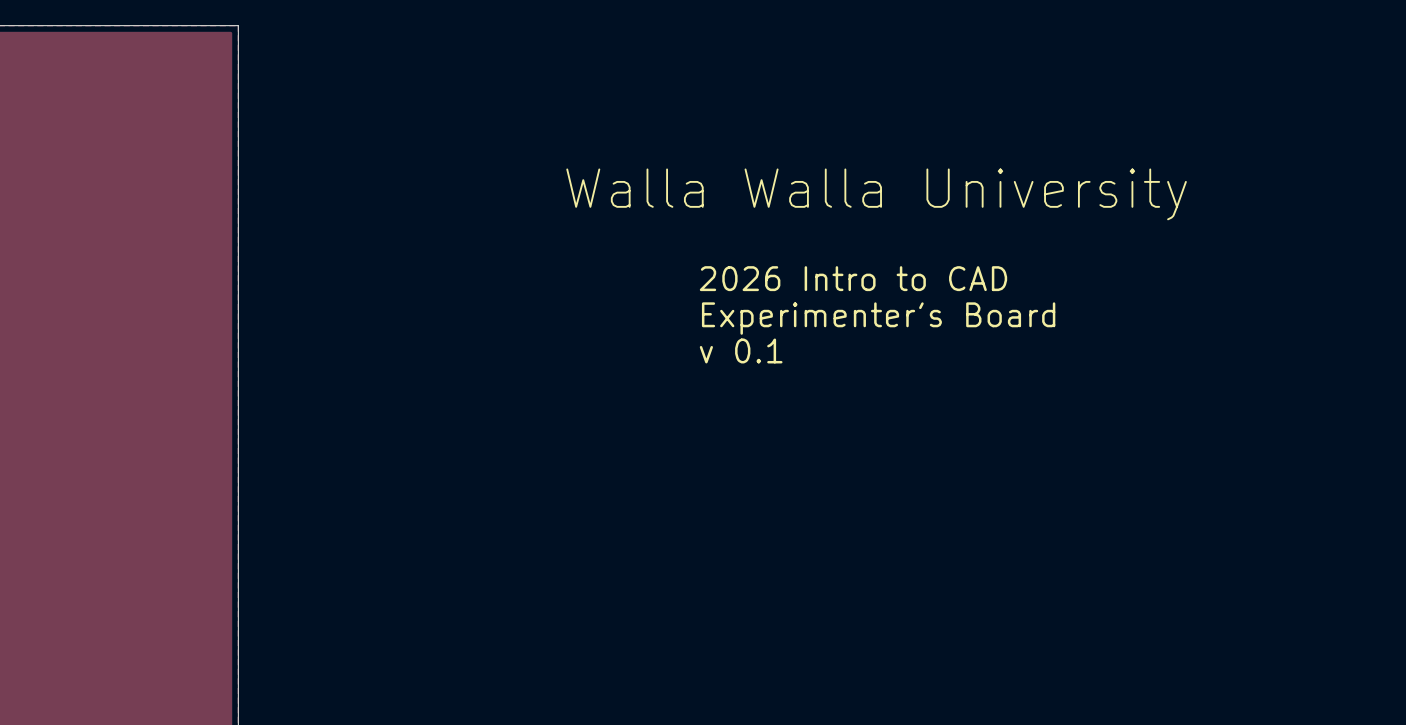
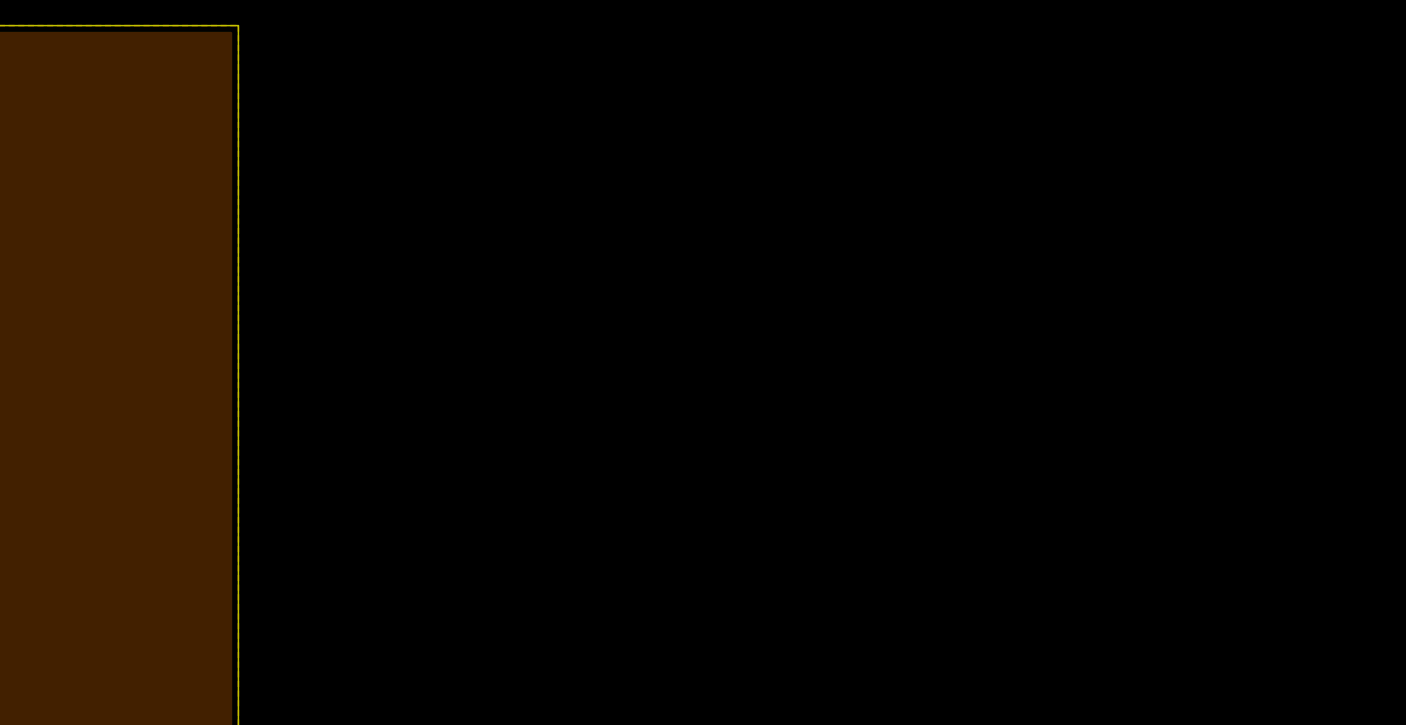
text: Walla Walla University (876, 194) -> none
text: 2026 Intro to CAD (853, 278) -> none
text: Experimenter's Board (878, 318) -> none
text: v 0.1 (741, 350) -> none

